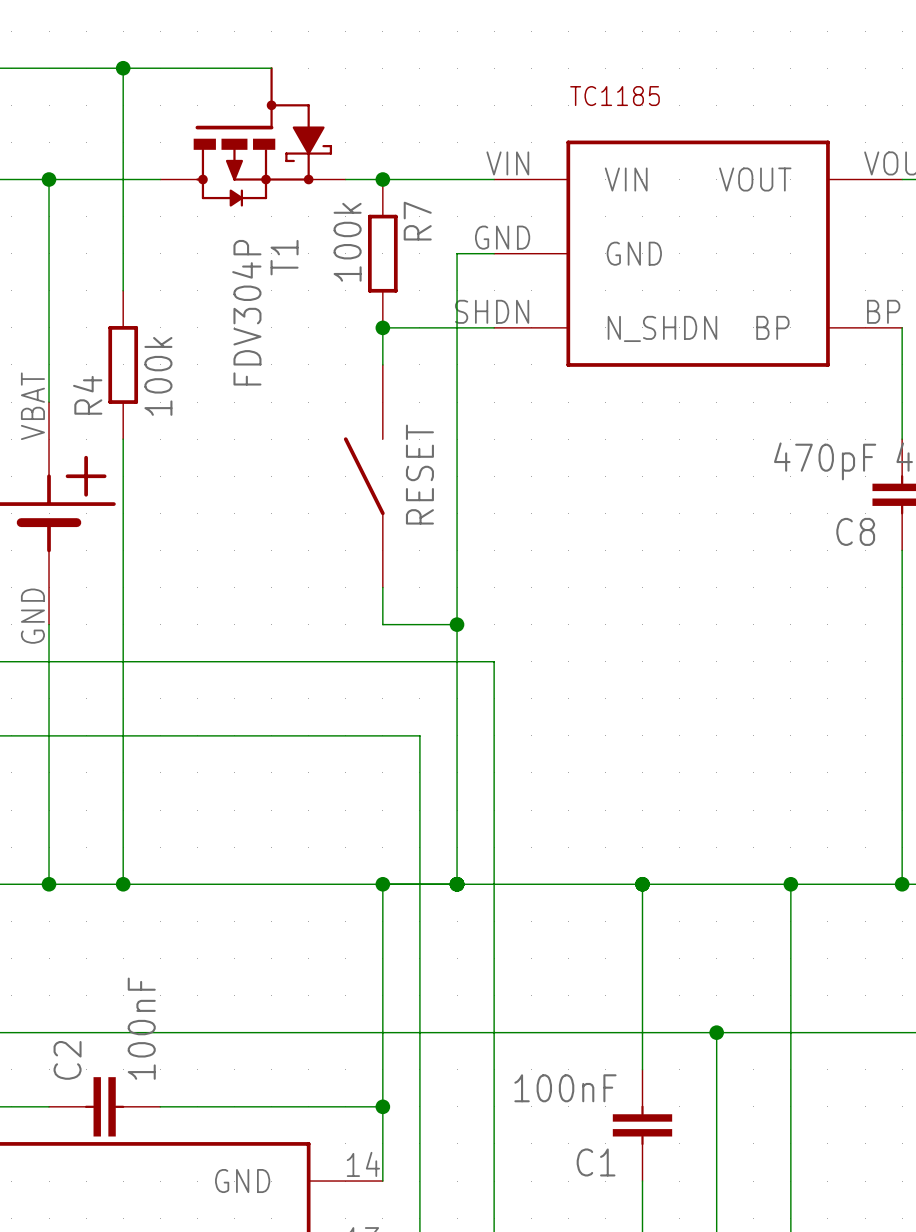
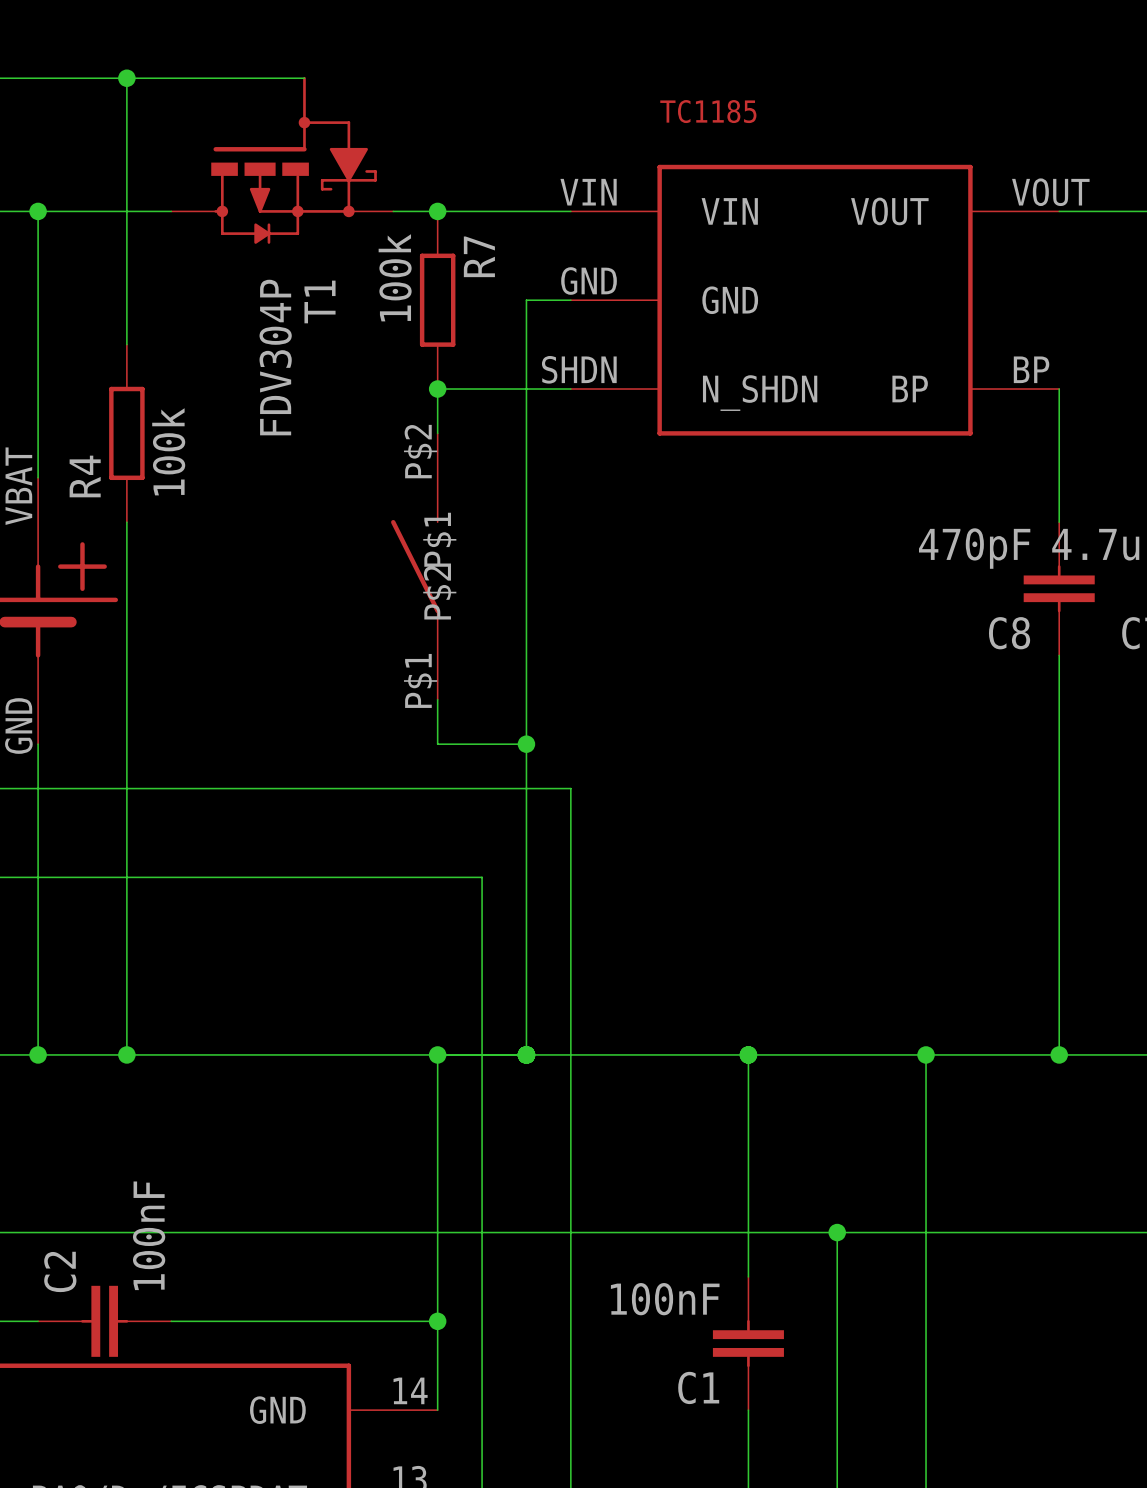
RESET pin number: none -> P$2 (420, 451)
RESET pin name: none -> P$1 (439, 539)
RESET name: RESET (419, 474) -> none
RESET pin name: none -> P$2 (439, 592)
RESET pin number: none -> P$1 (420, 680)

